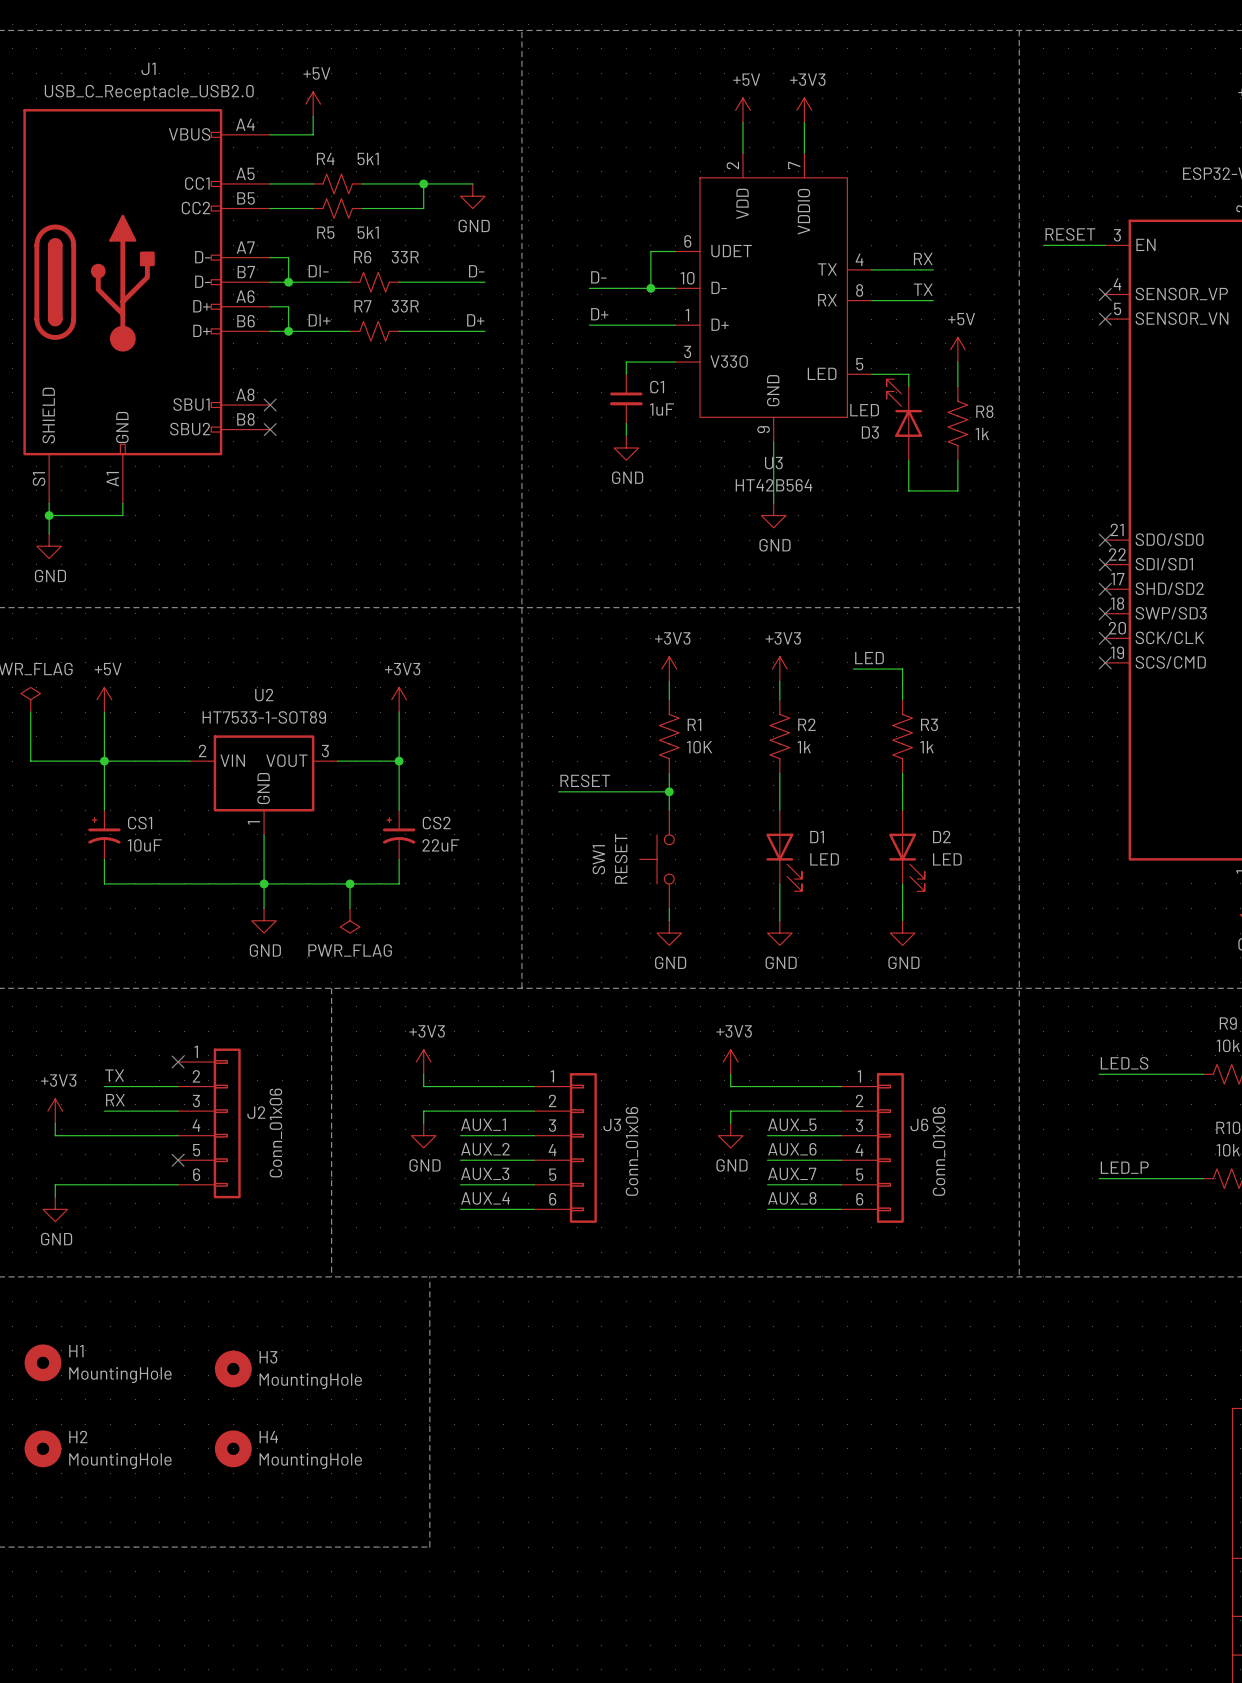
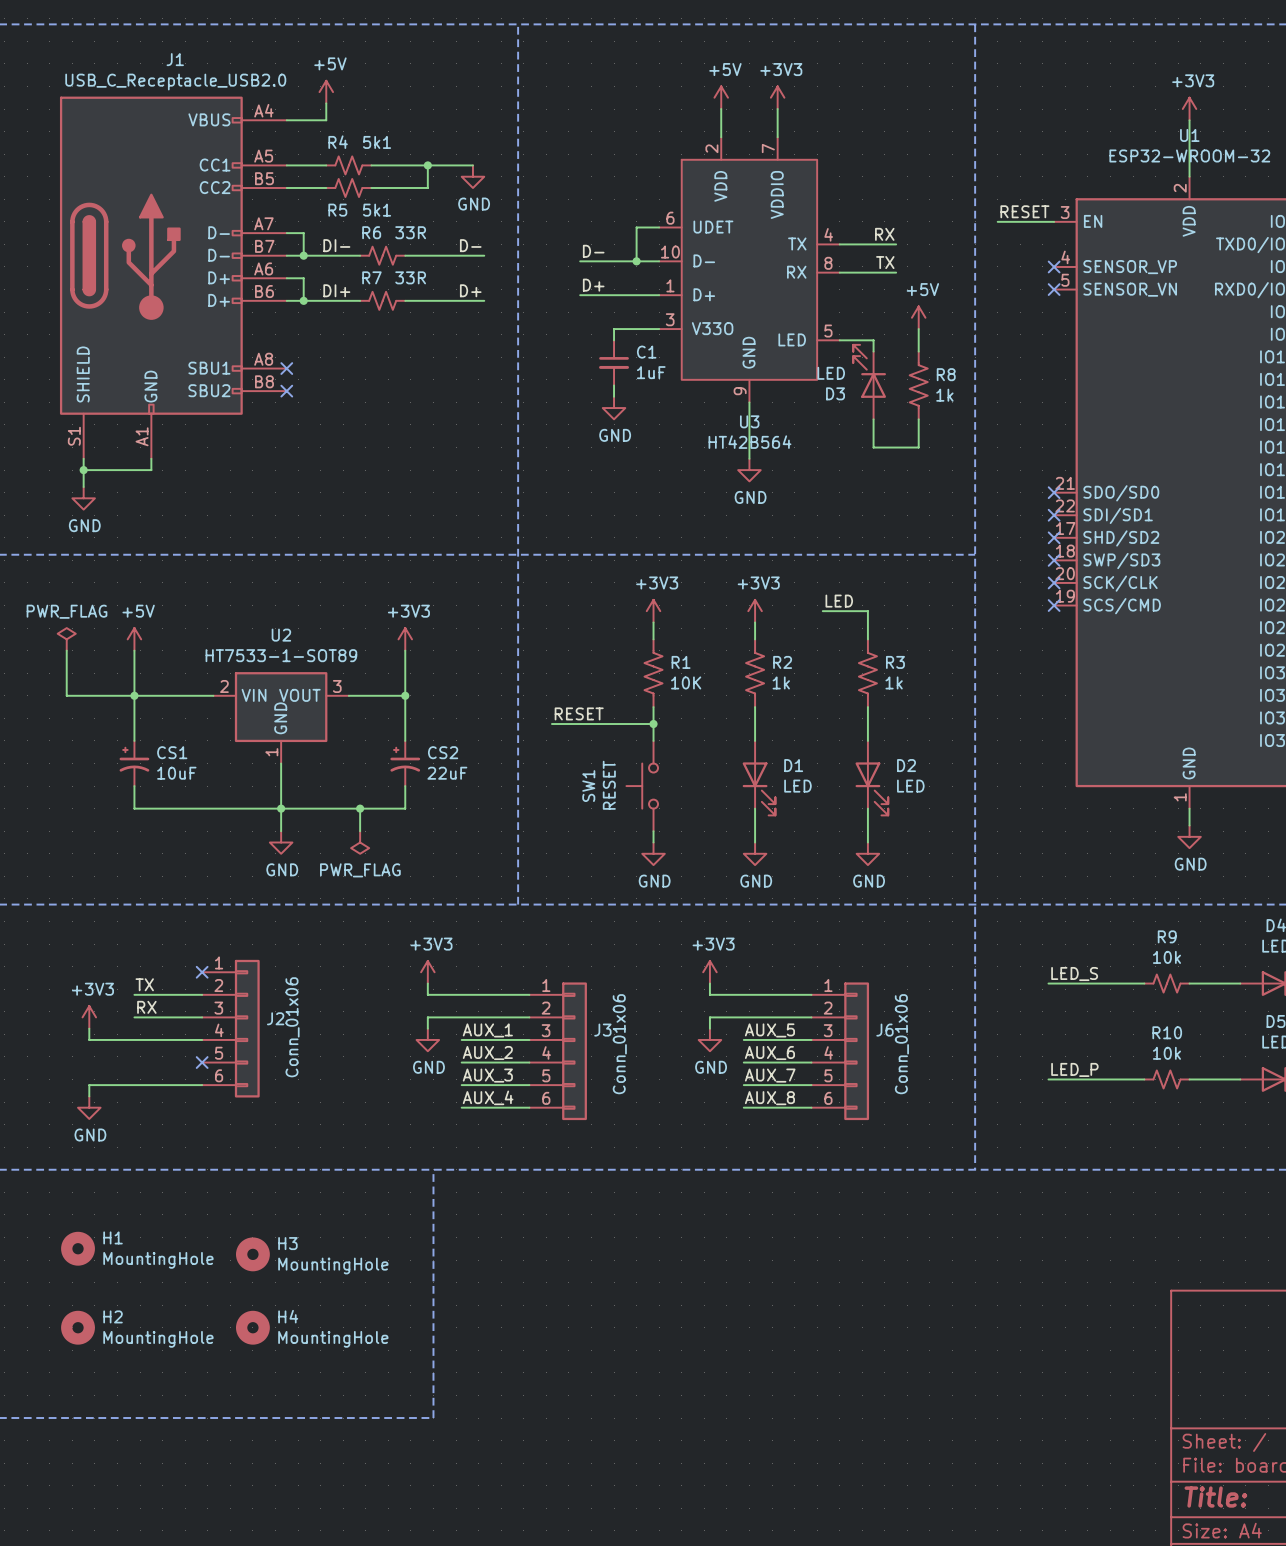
line: (331, 988) (331, 1276) -> none

